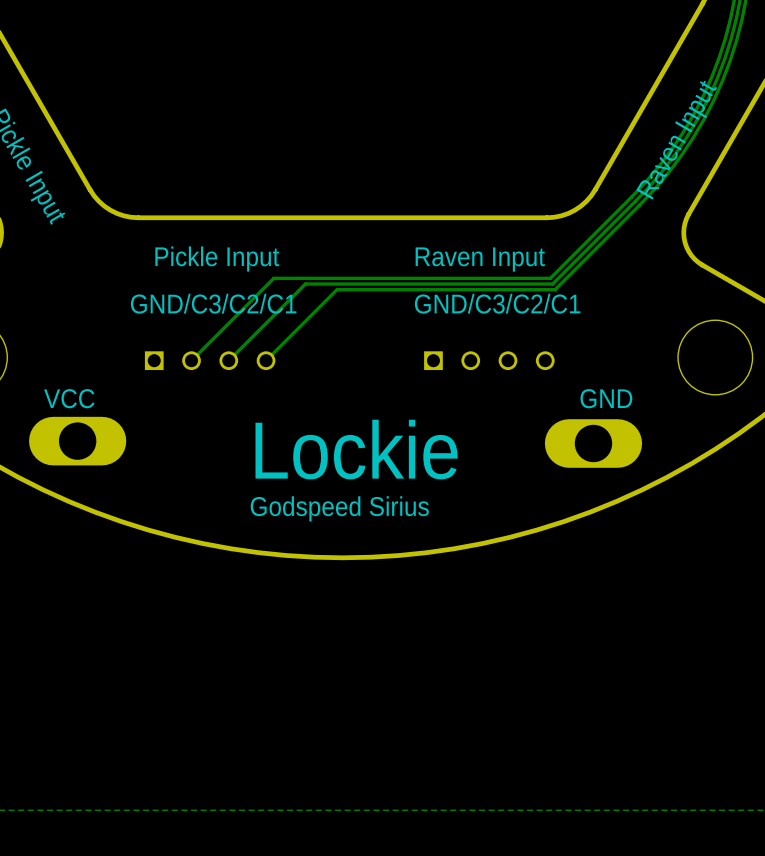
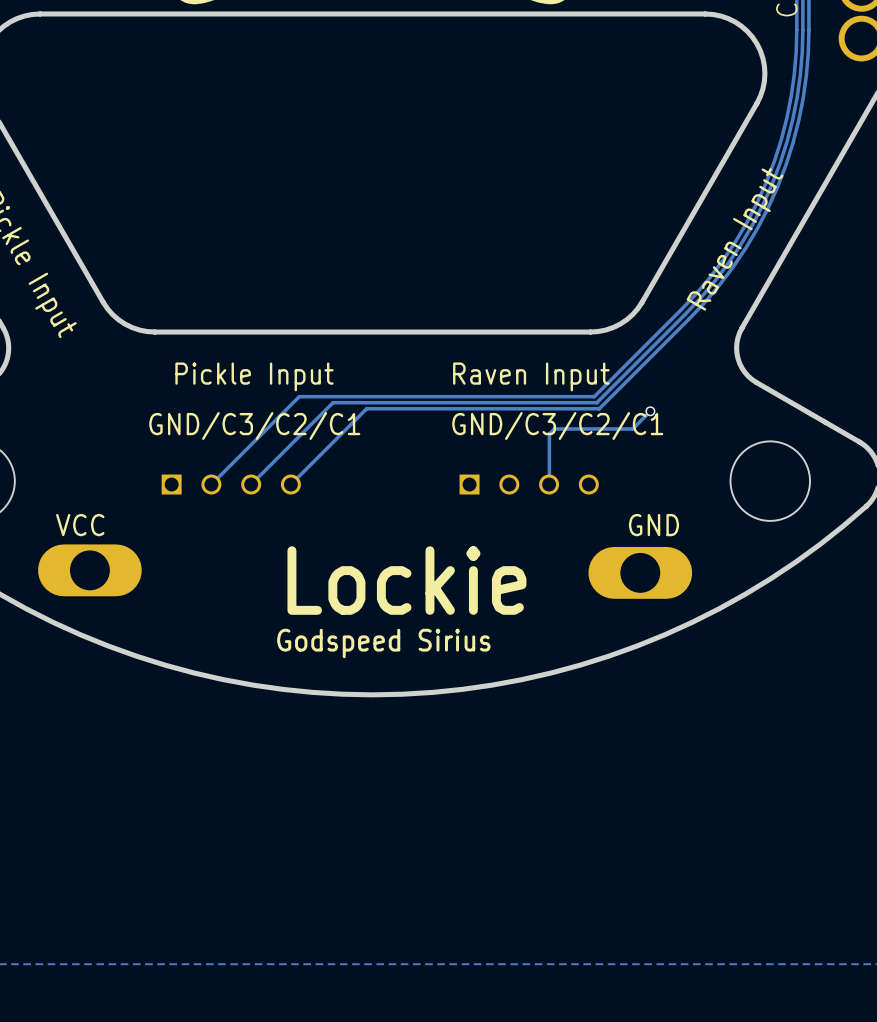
track: none -> (650, 411) (632, 428) (554, 428) (549, 434) (549, 484)
via: none -> (650, 411)

